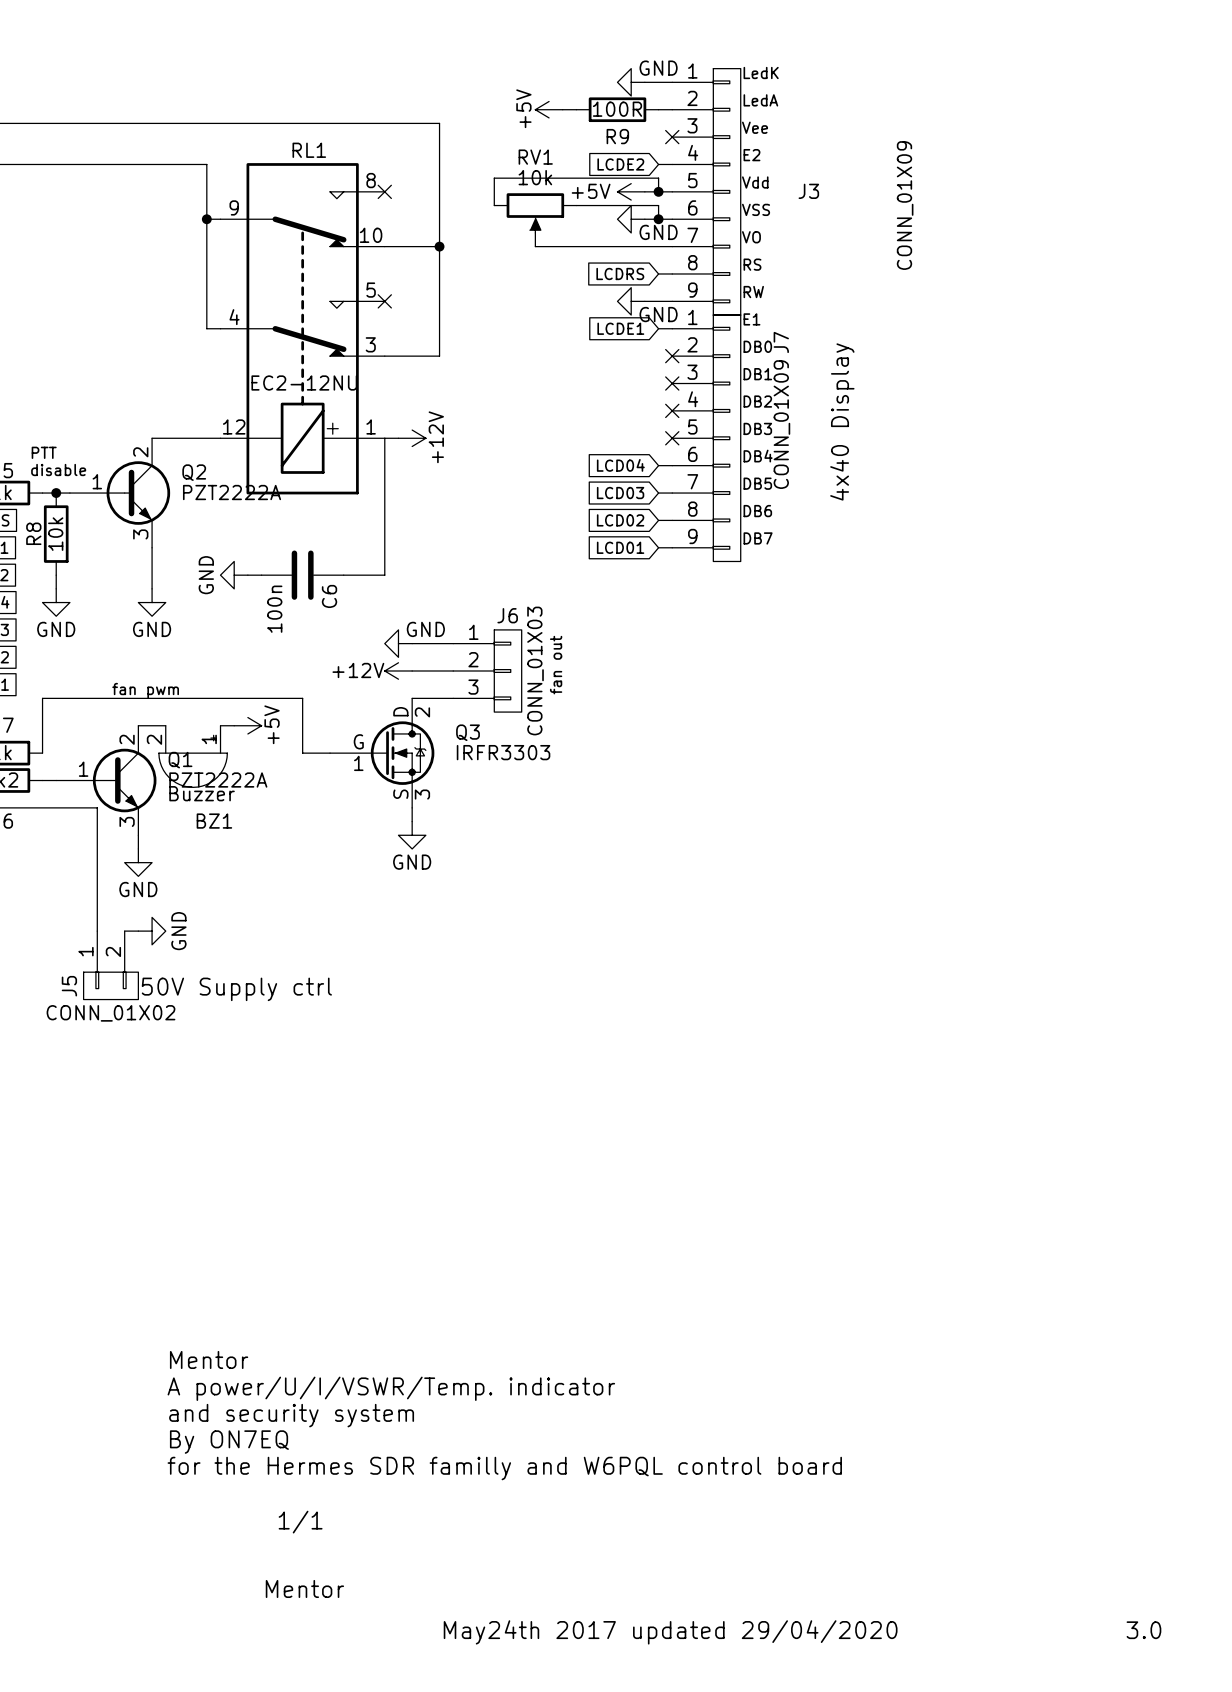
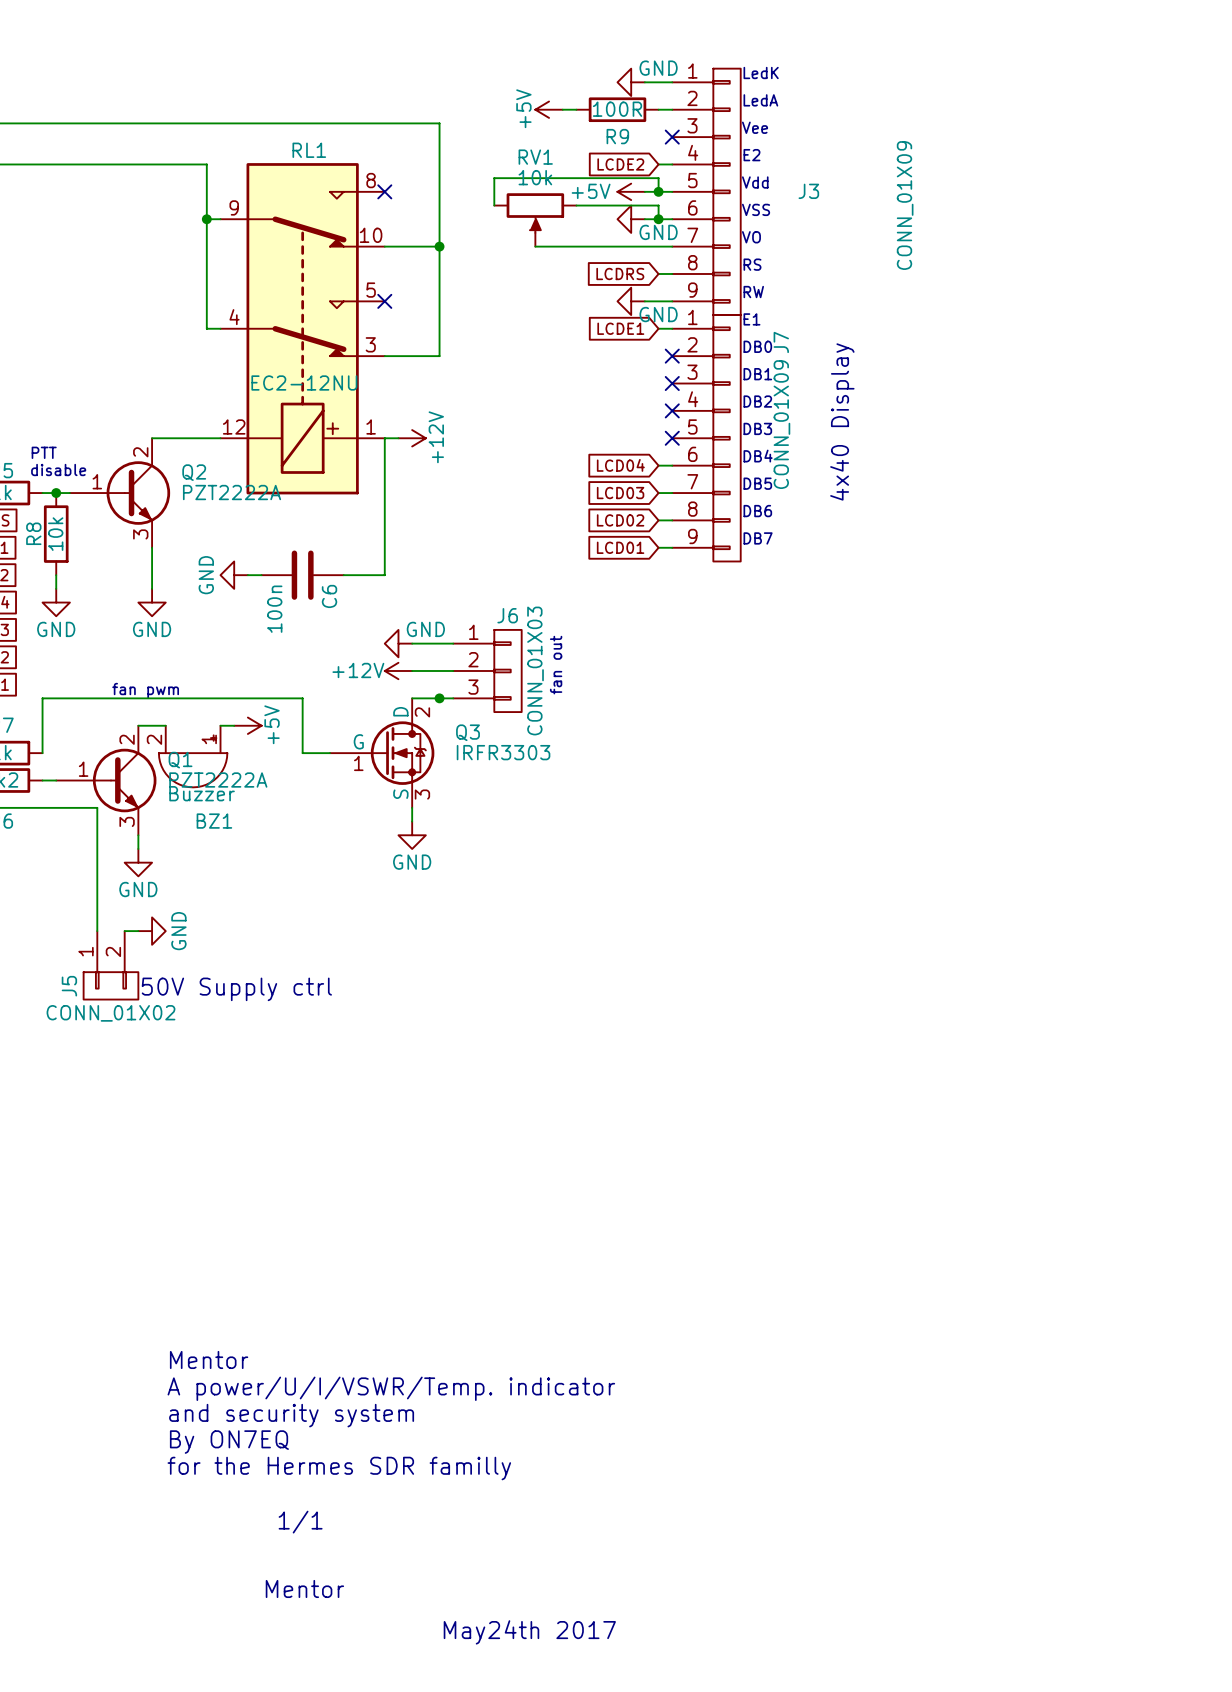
junction: none -> (439, 698)
text: for the Hermes SDR familly and W6PQL control board (504, 1468) -> for the Hermes SDR familly (339, 1468)
text: 3.0 (1143, 1630) -> none
text: May24th 2017 updated 29/04/2020 (670, 1632) -> May24th 2017 (529, 1632)

